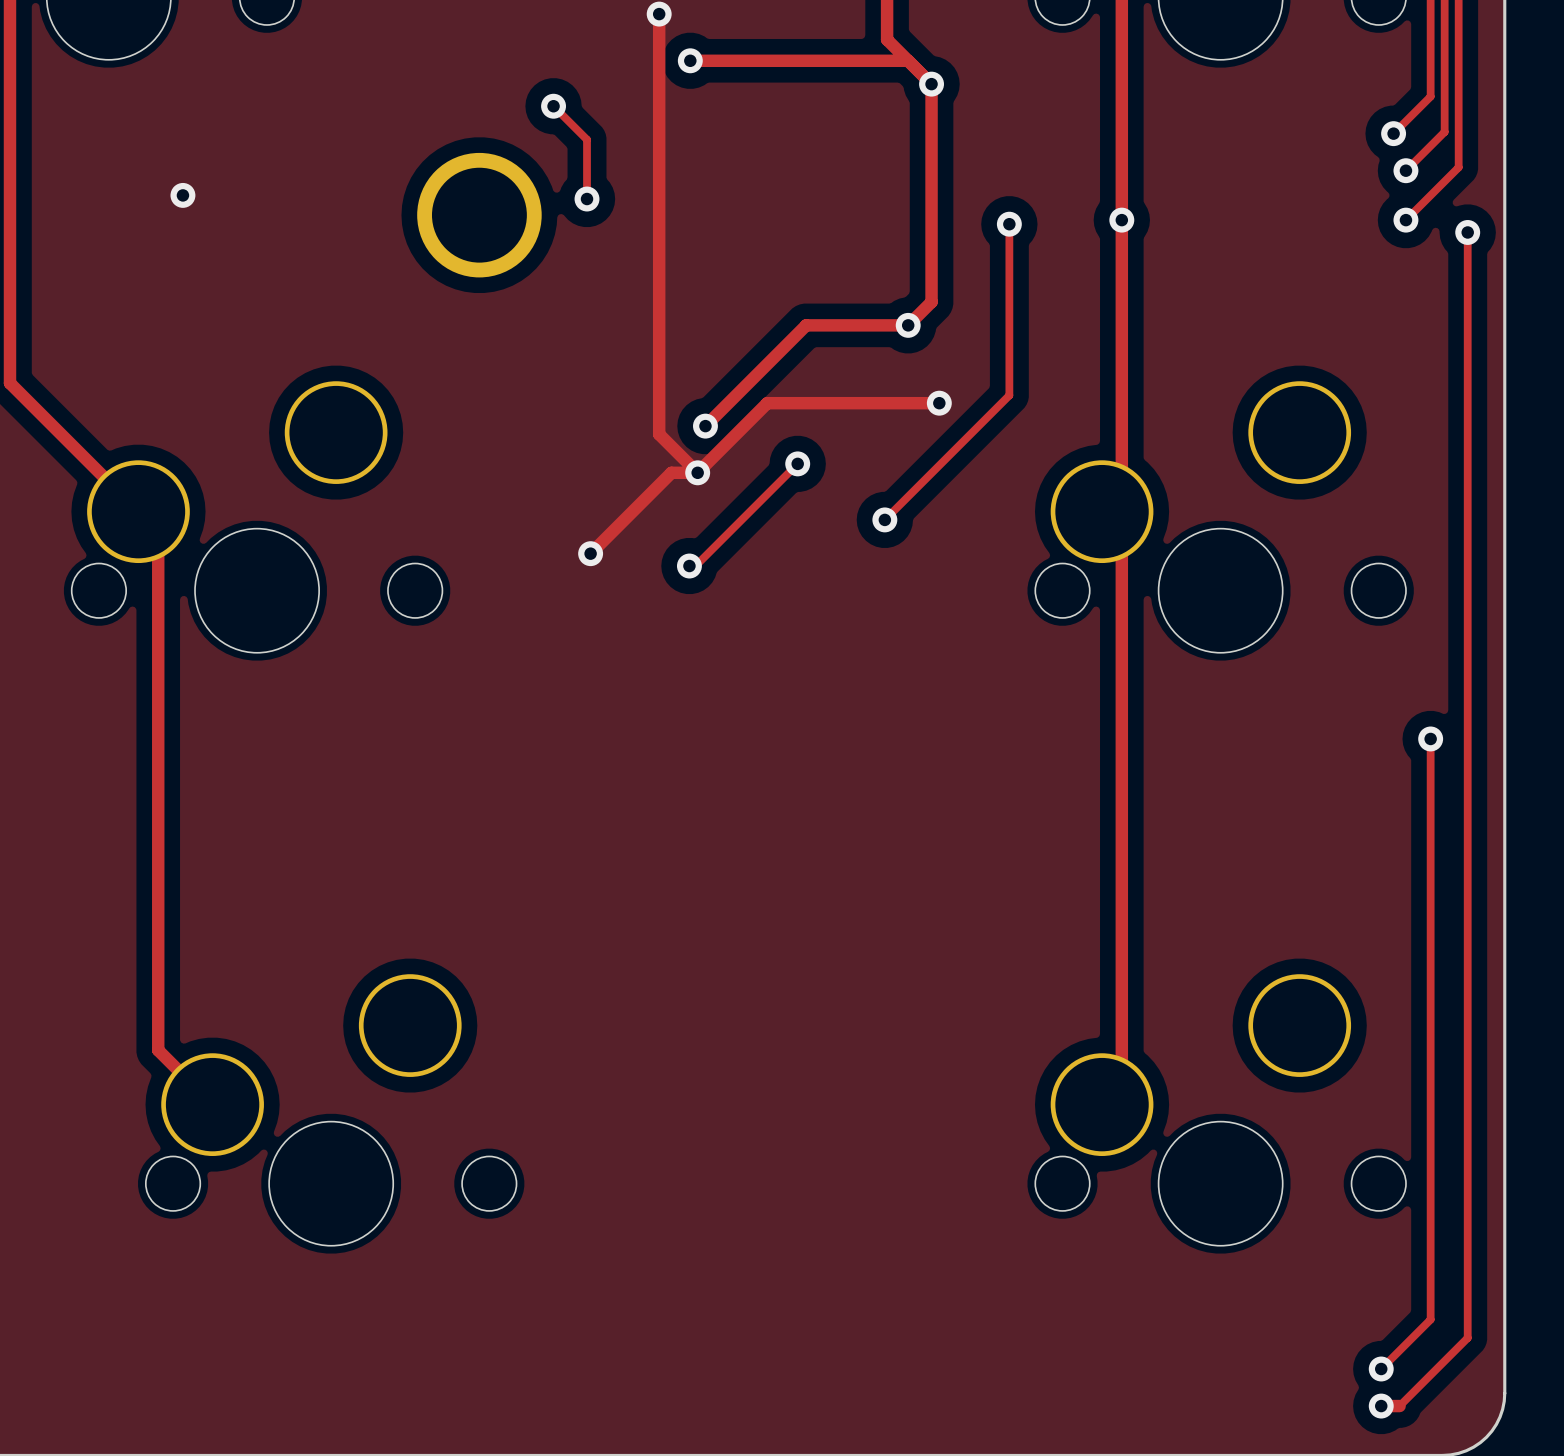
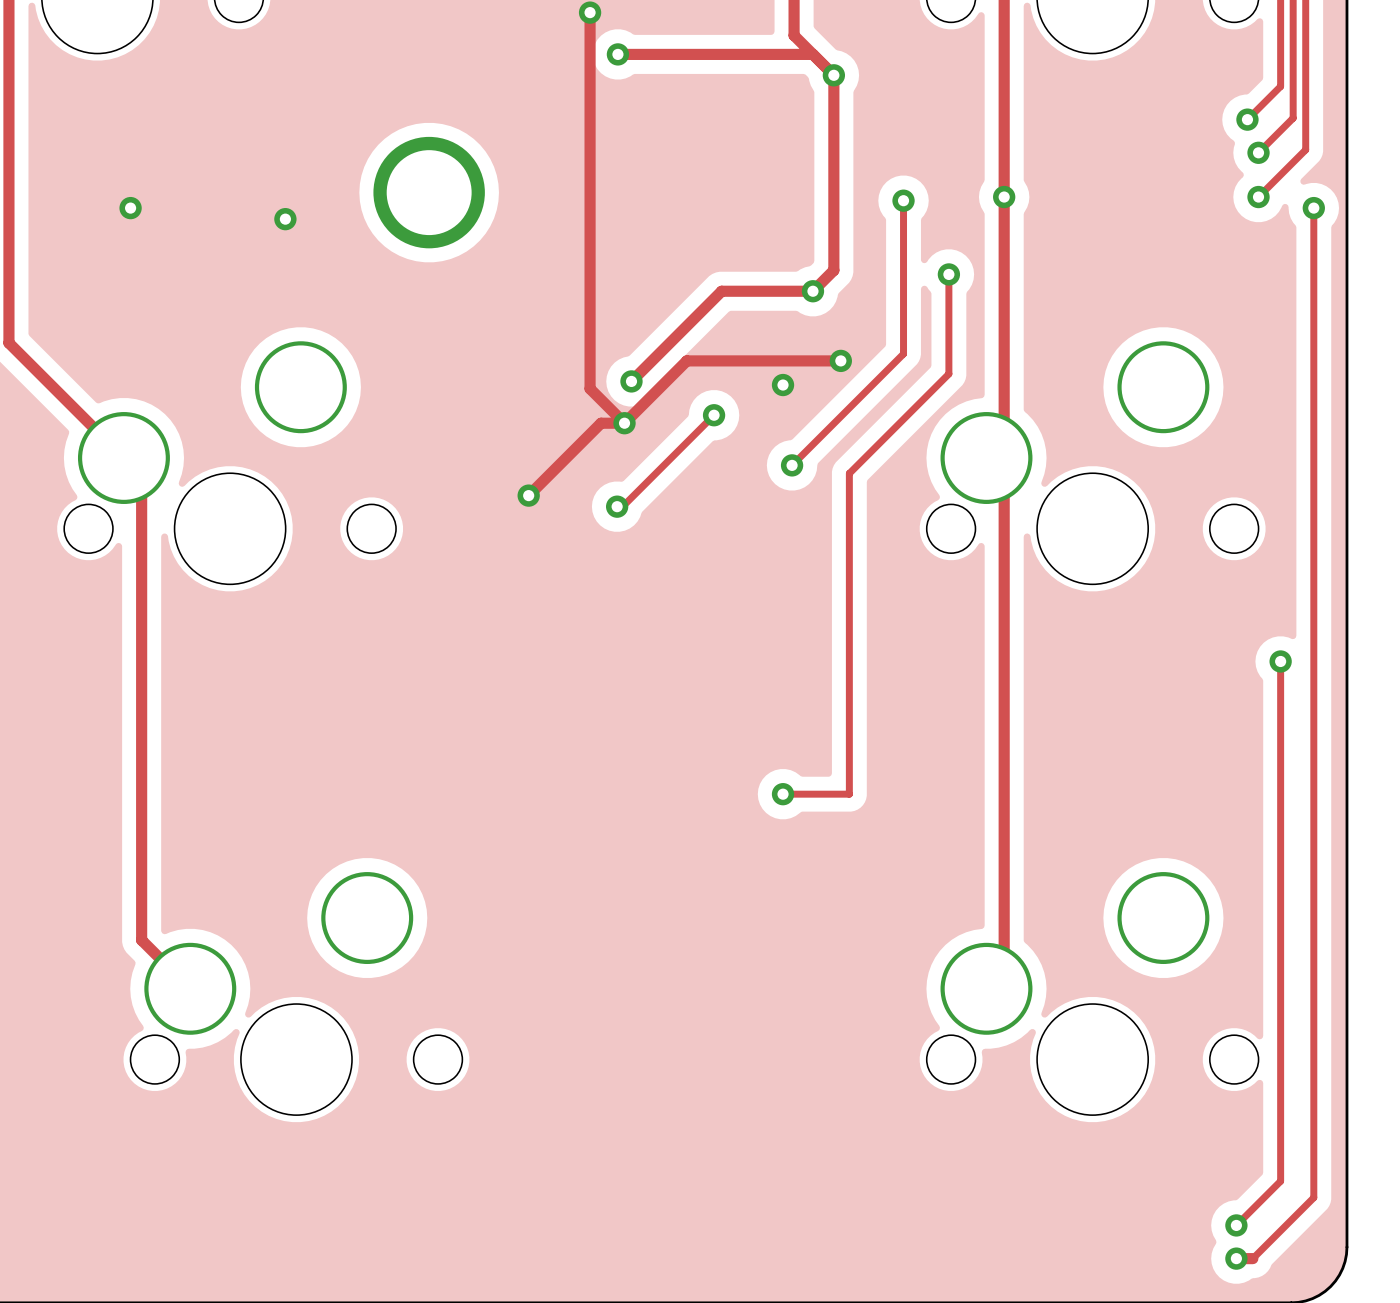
track: (553, 106) (587, 139) (587, 199) -> none
via: (553, 106) -> none
via position: (182, 195) -> (130, 208)
via: (587, 199) -> none
via: none -> (285, 219)
track: none -> (948, 274) (948, 373) (849, 473) (849, 794) (783, 794)
via: none -> (948, 274)
via: none -> (783, 385)
via: none -> (783, 794)

